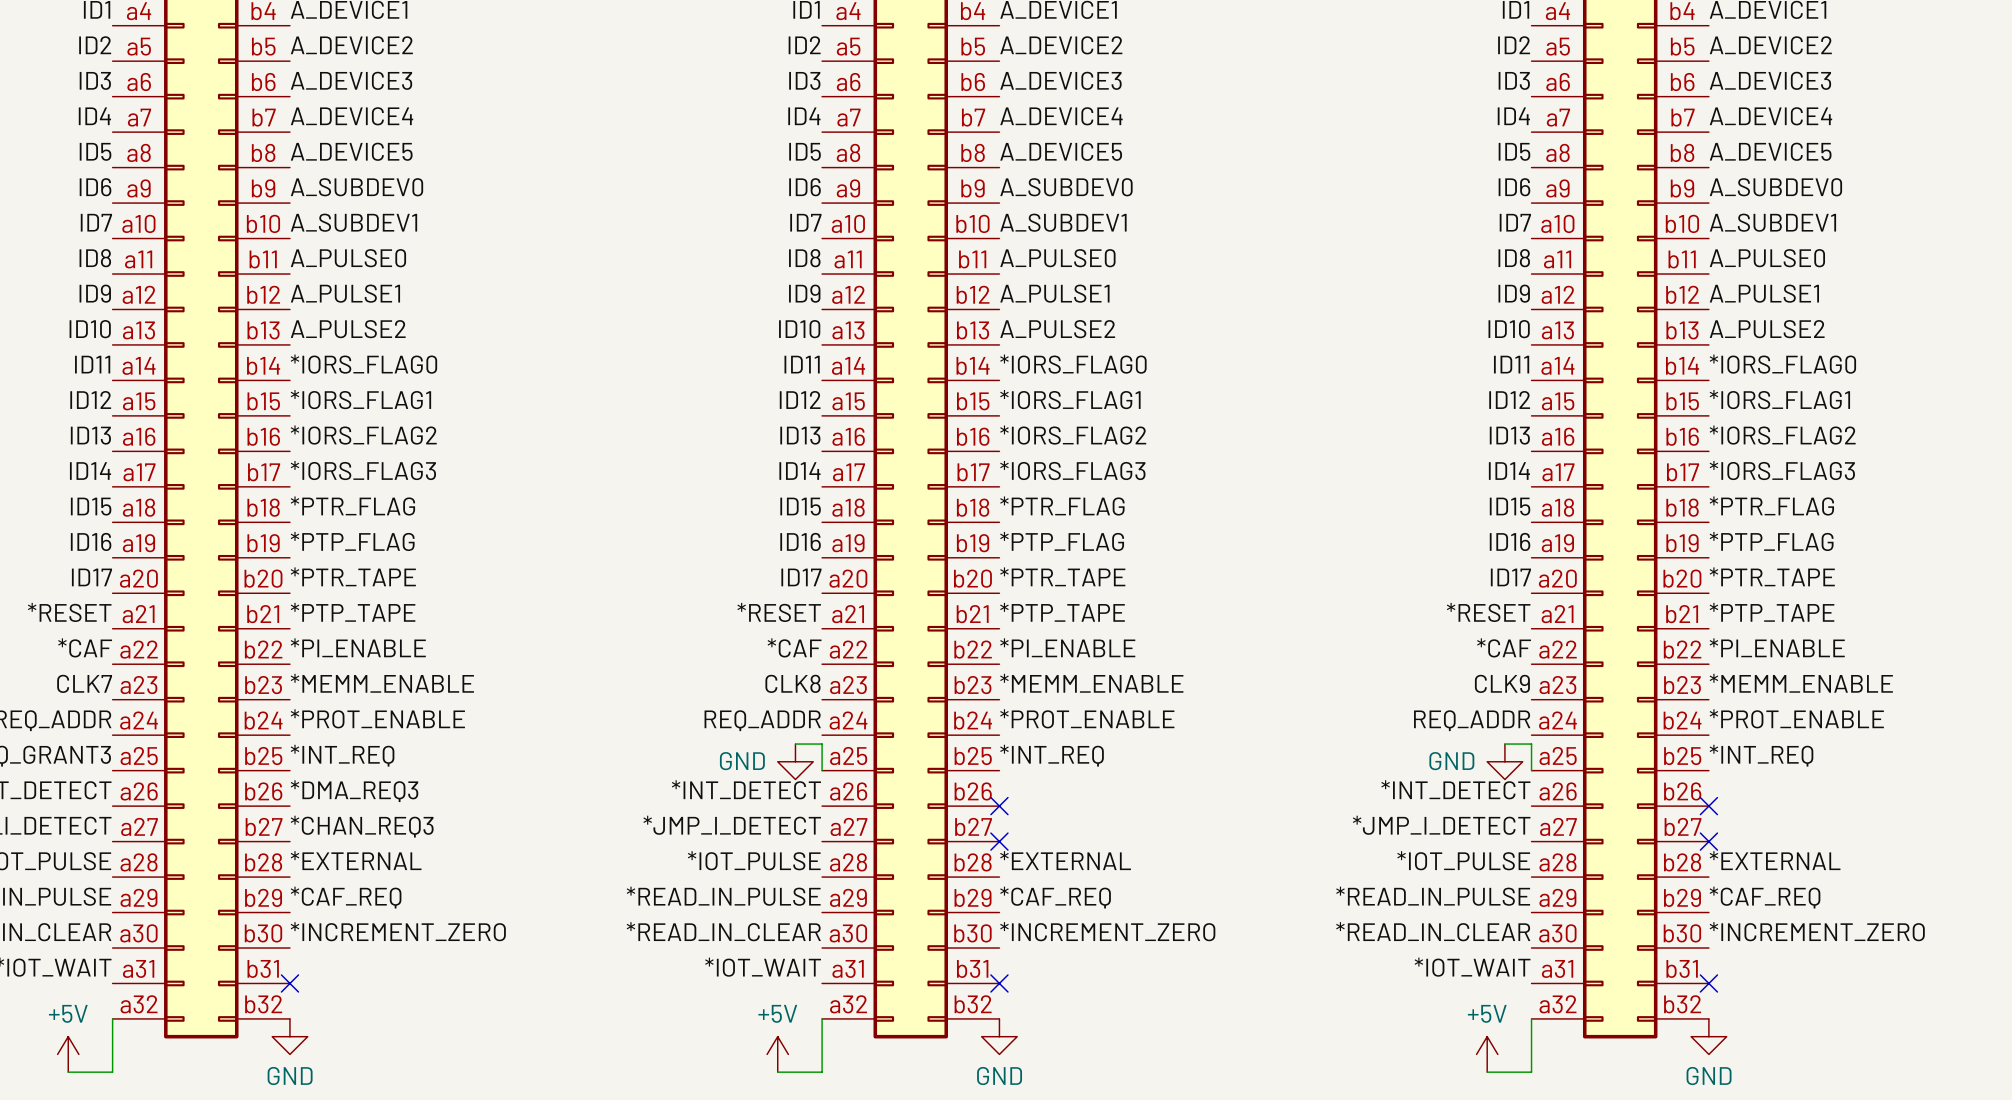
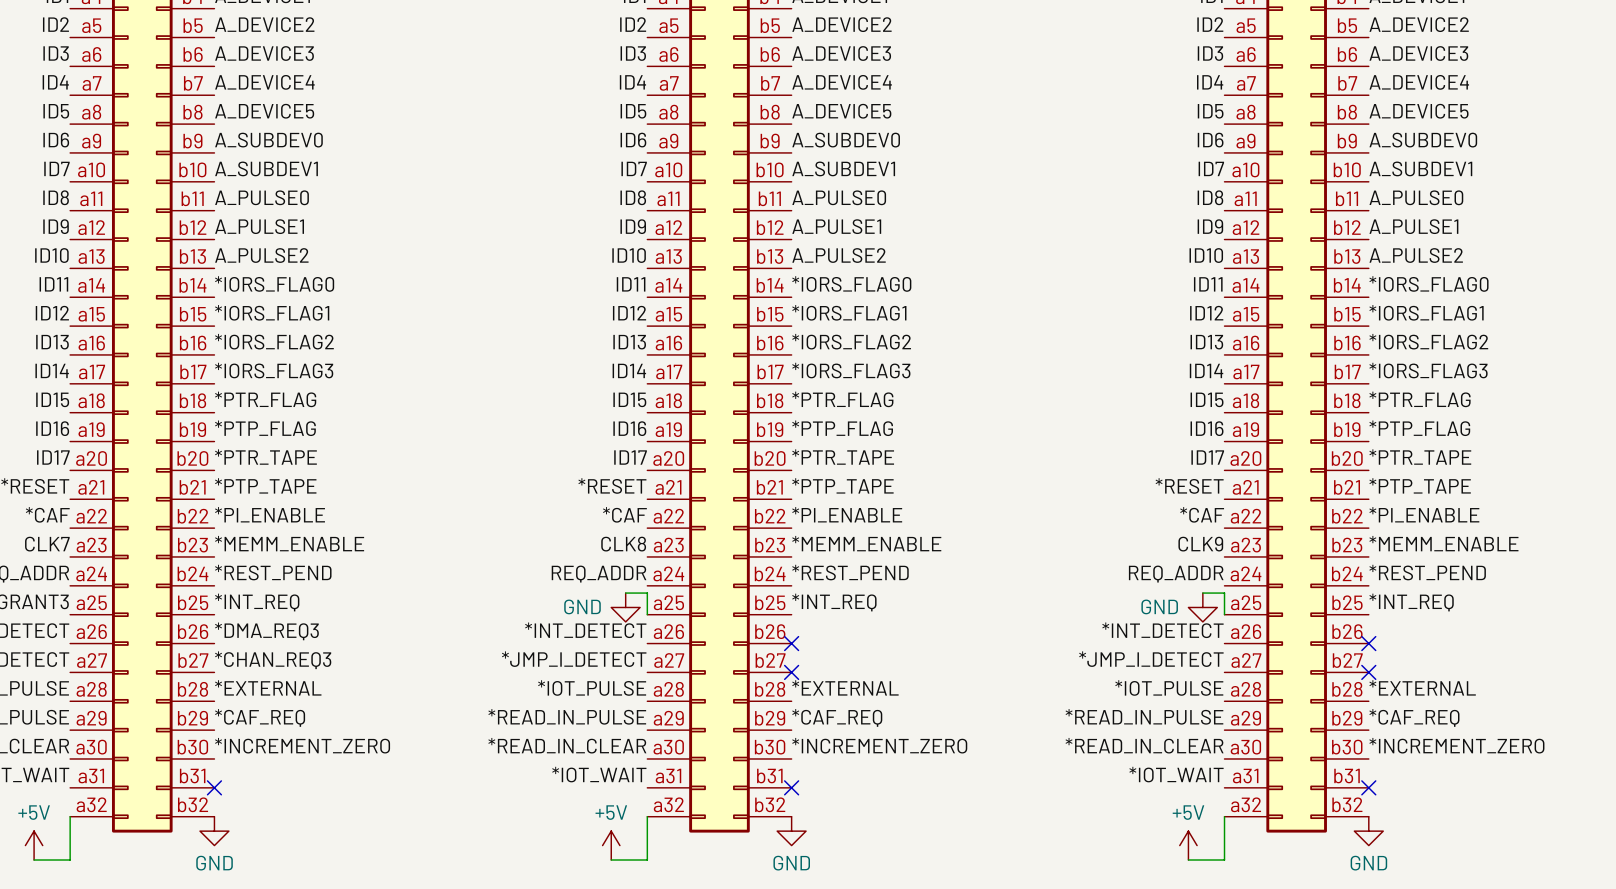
label: *PROT_ENABLE (377, 718) -> *REST_PEND (273, 572)
label: *PROT_ENABLE (1087, 718) -> *REST_PEND (850, 572)
label: *PROT_ENABLE (1796, 718) -> *REST_PEND (1427, 572)

